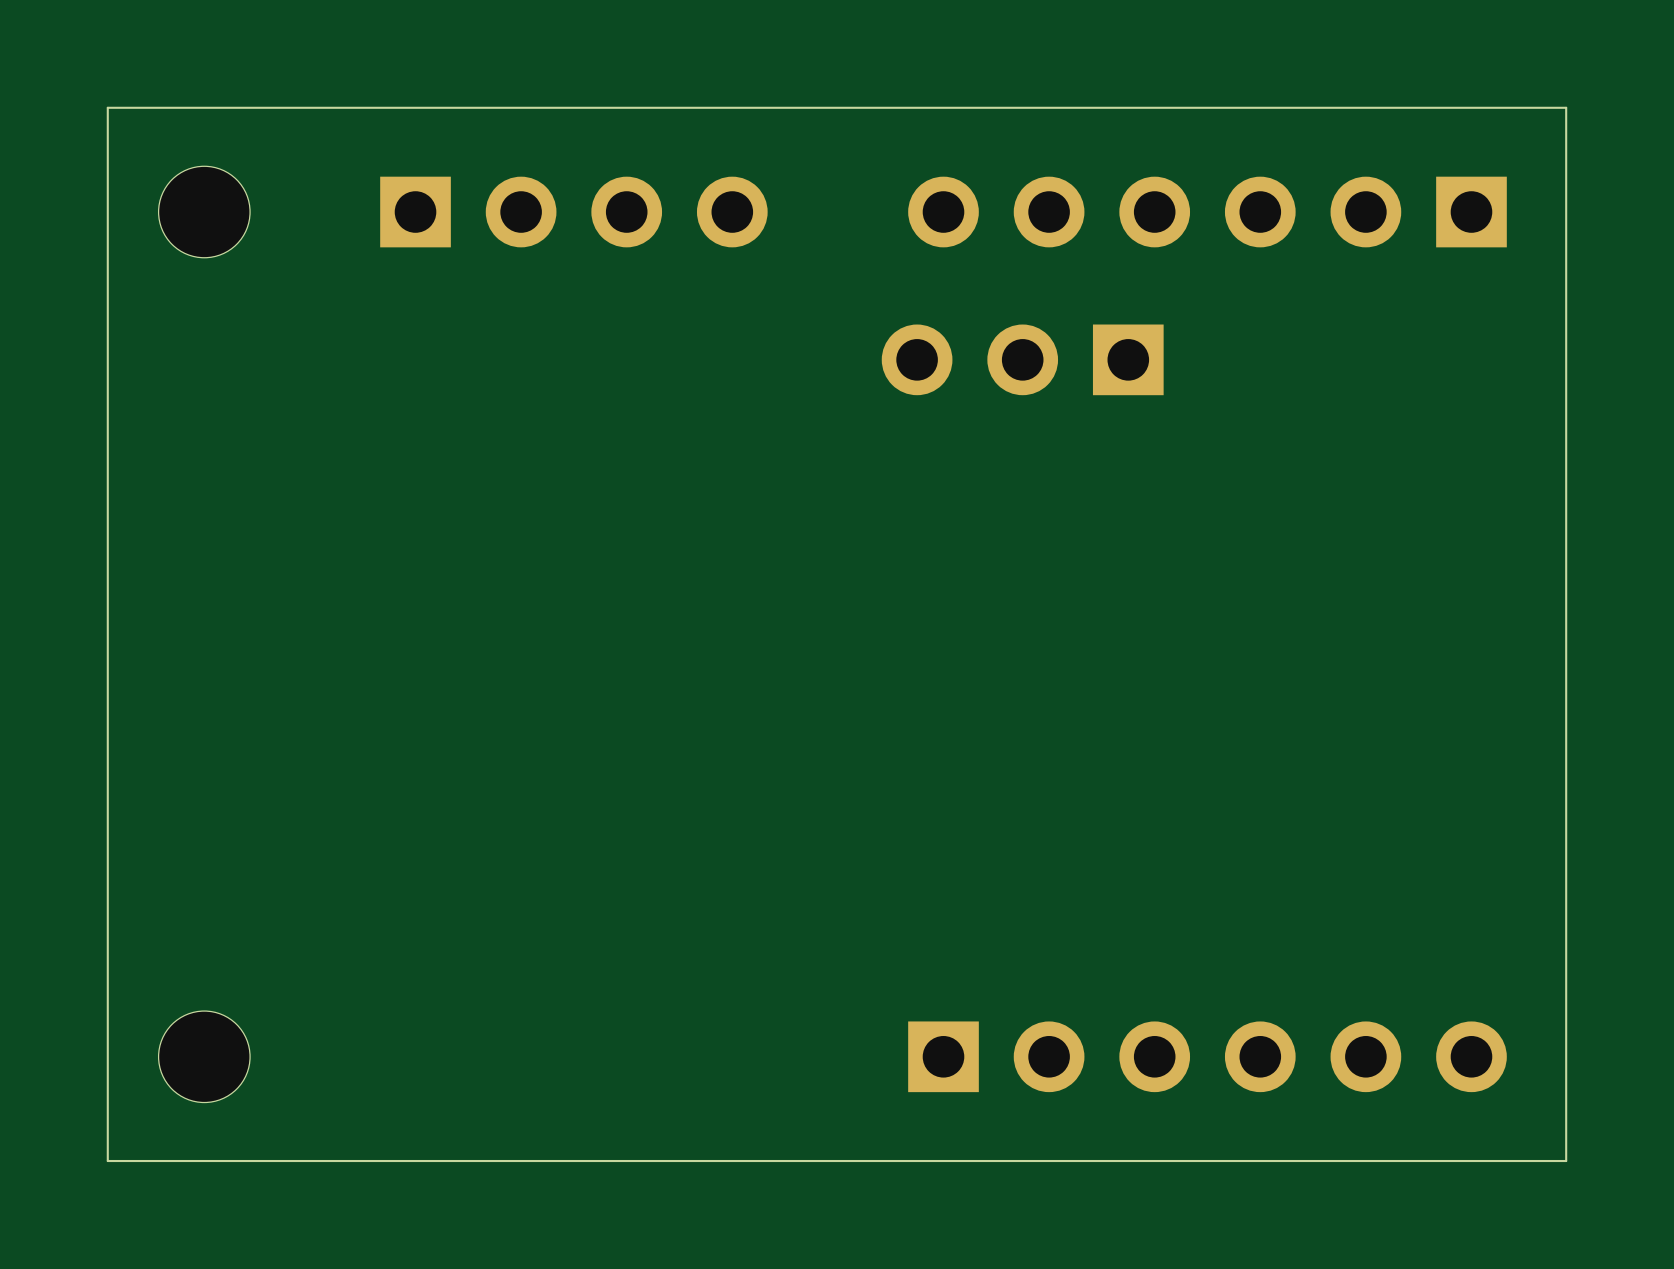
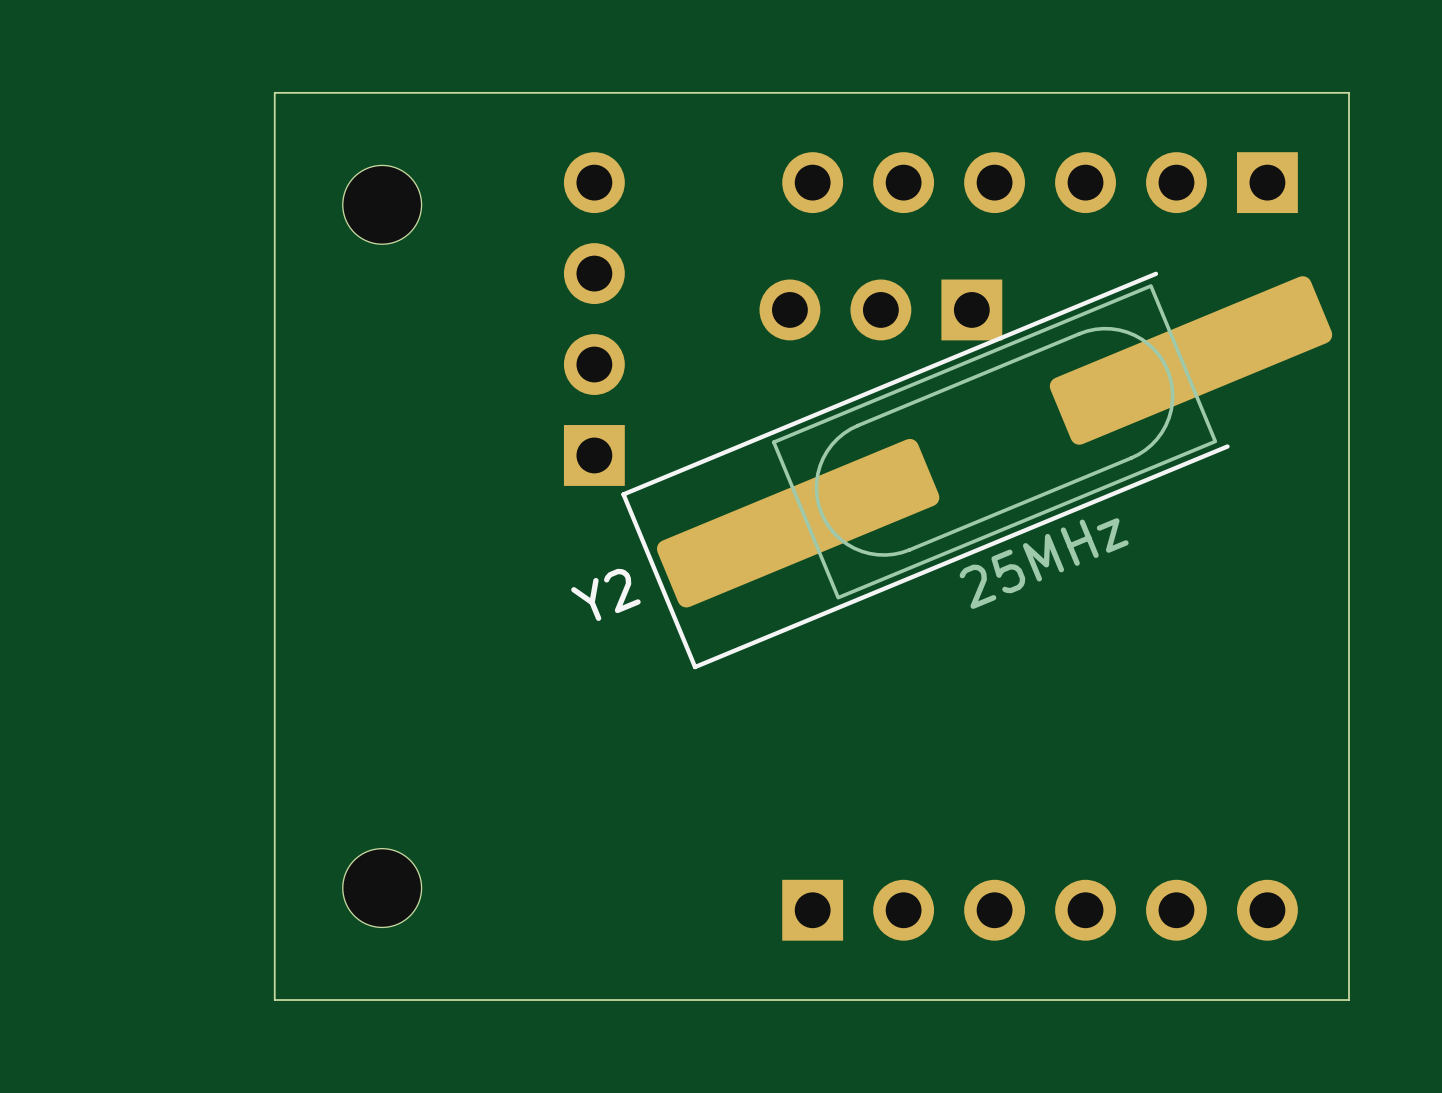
board edge: (318, 107) (107, 107) (107, 1161) (318, 1161) -> (274, 92) (274, 1000)
part position: (204, 212) -> (382, 204)
part rotation: 0° (573, 212) -> 90° counterclockwise (594, 319)
Y2: none -> 25MHz (976, 470)
part position: (204, 1056) -> (382, 888)

